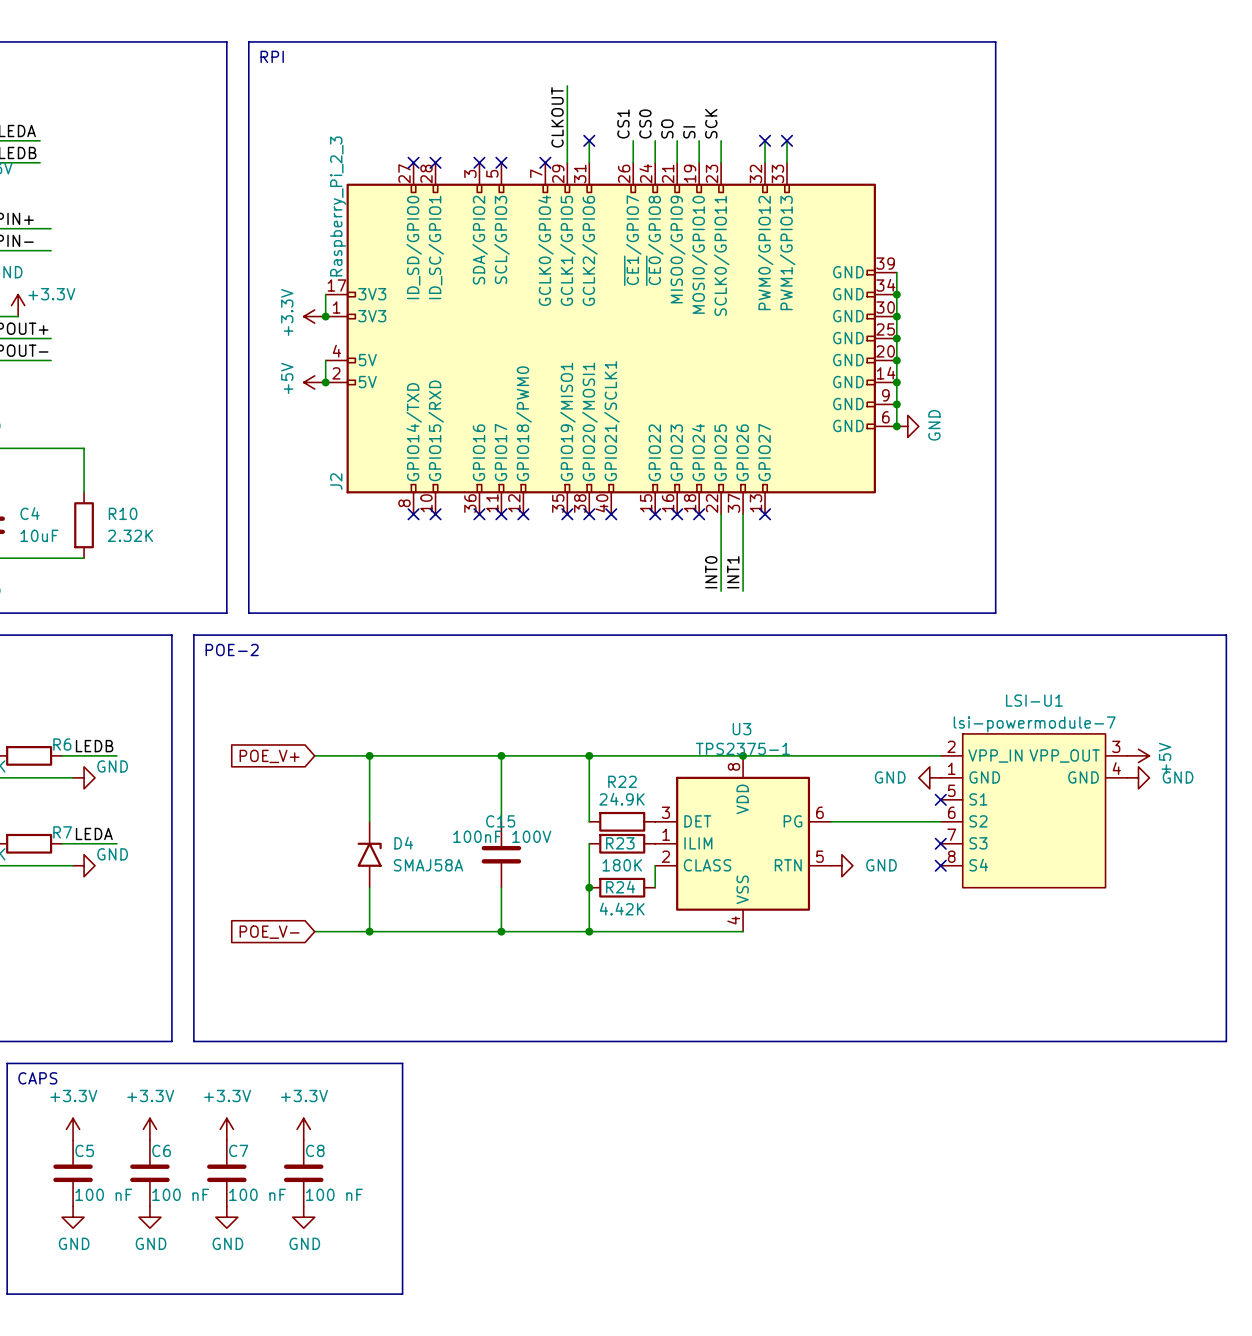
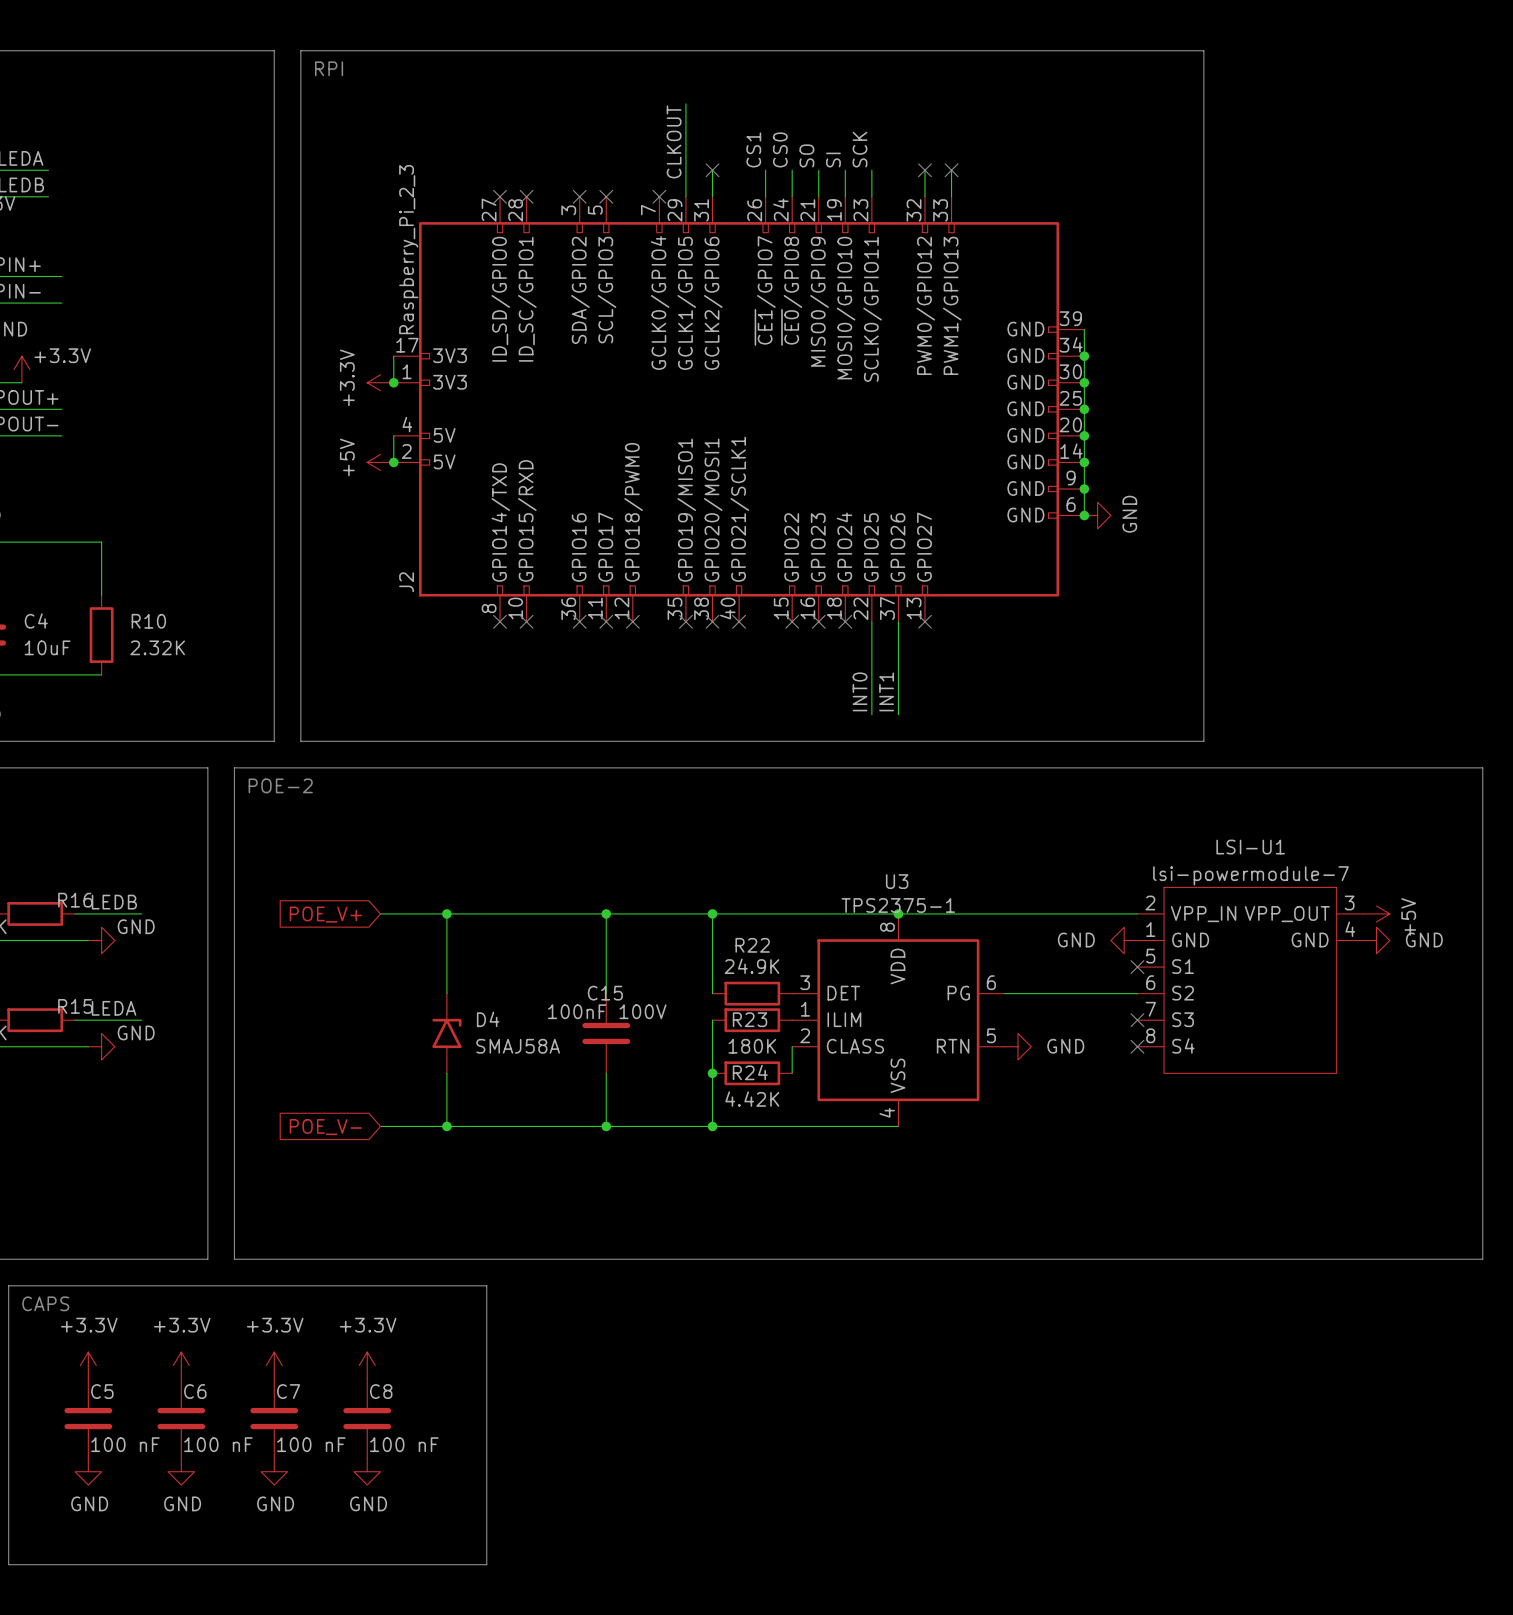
R6 name: R6 (62, 744) -> R16 (75, 900)
R7 name: R7 (62, 832) -> R15 (75, 1006)

